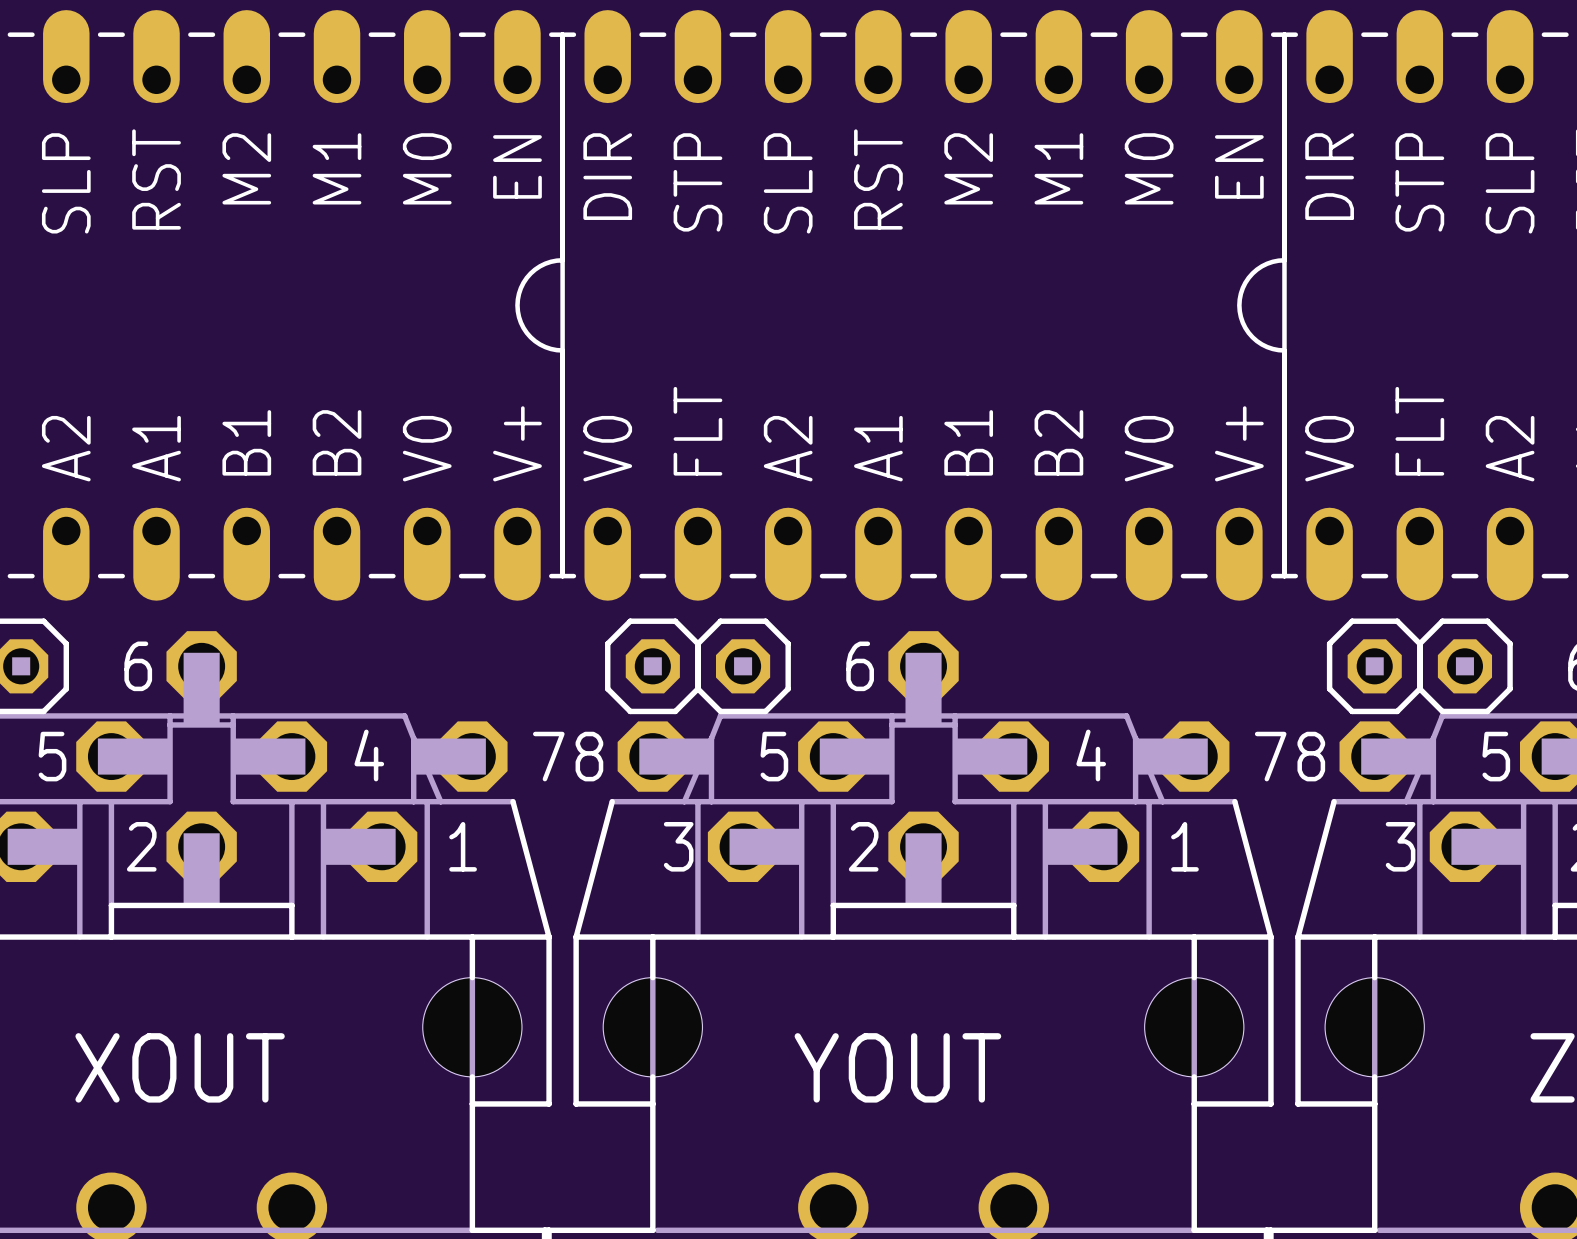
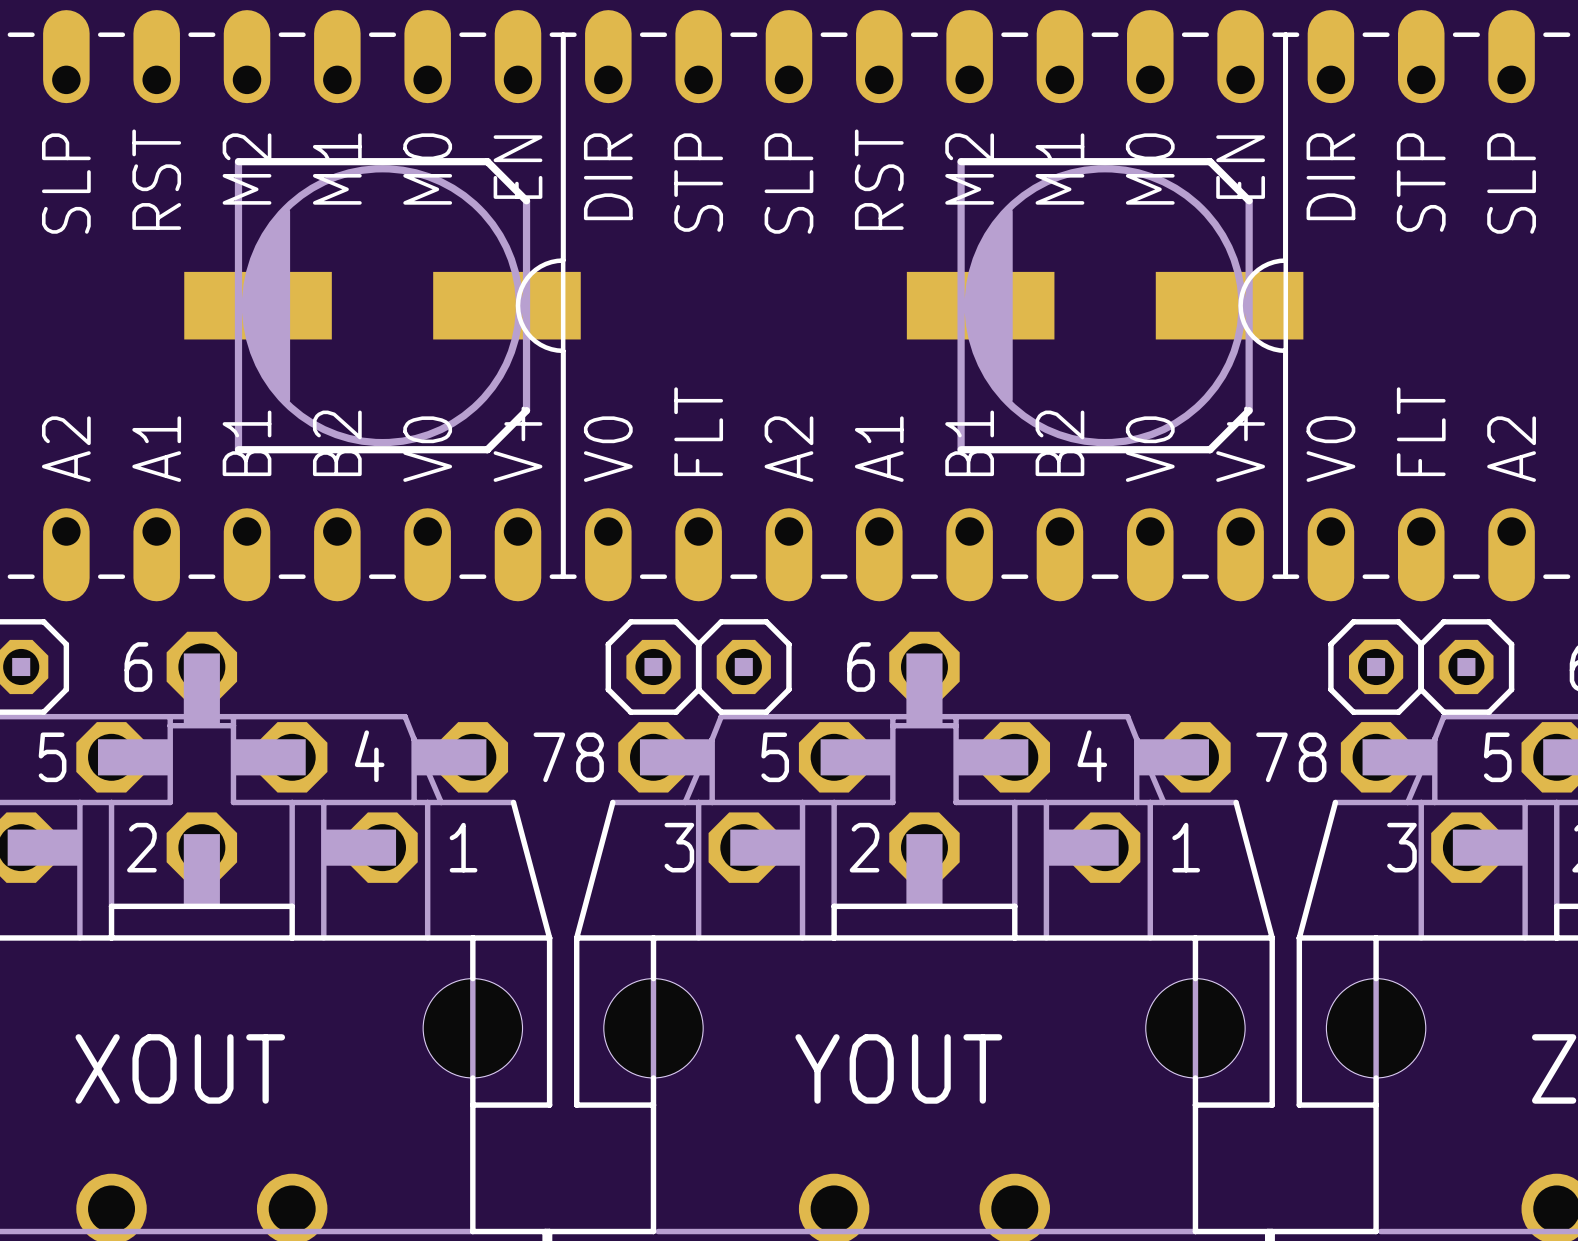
part: none -> (382, 305)
part: none -> (1105, 305)

